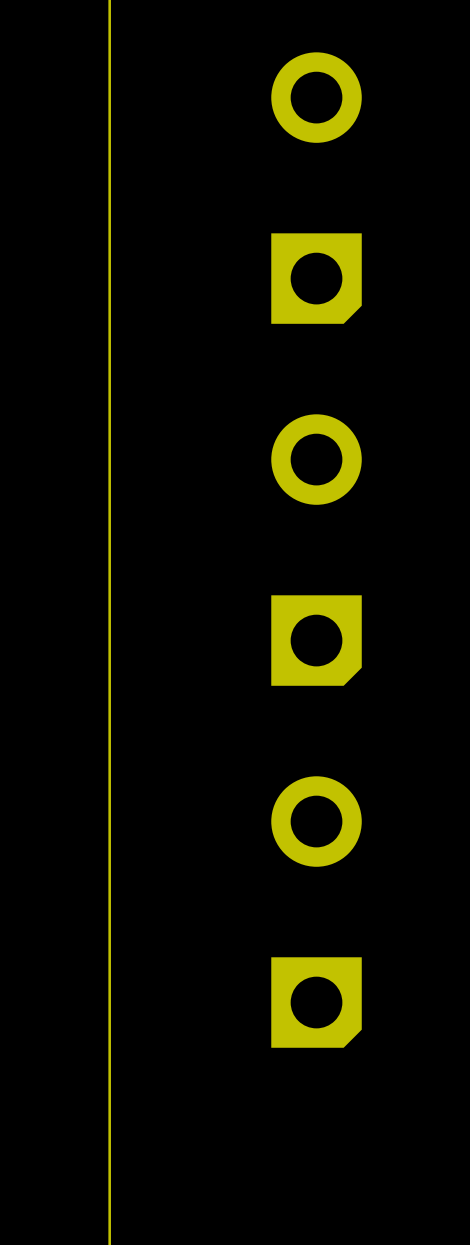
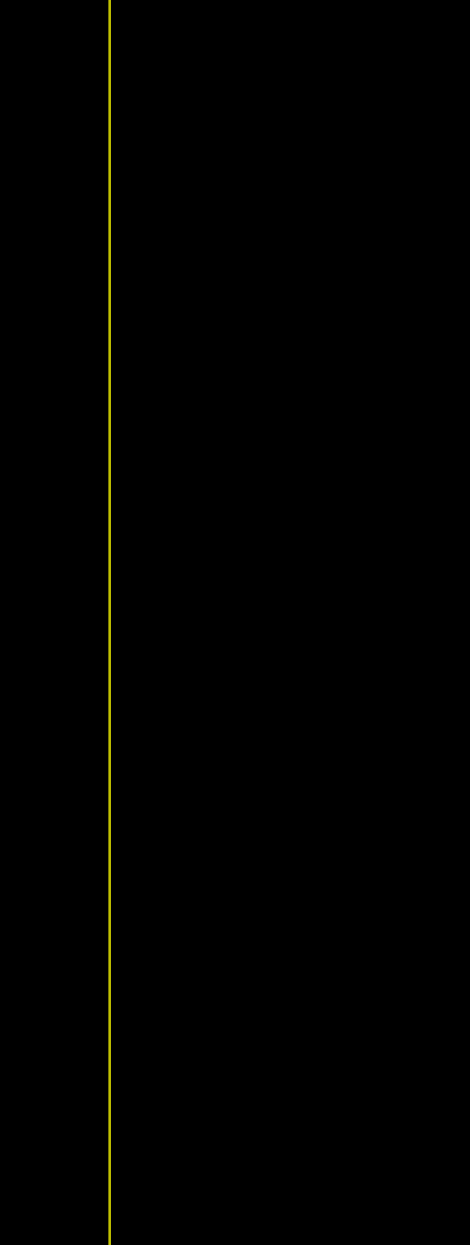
part: (316, 188) -> none
part: (316, 550) -> none
part: (316, 912) -> none

